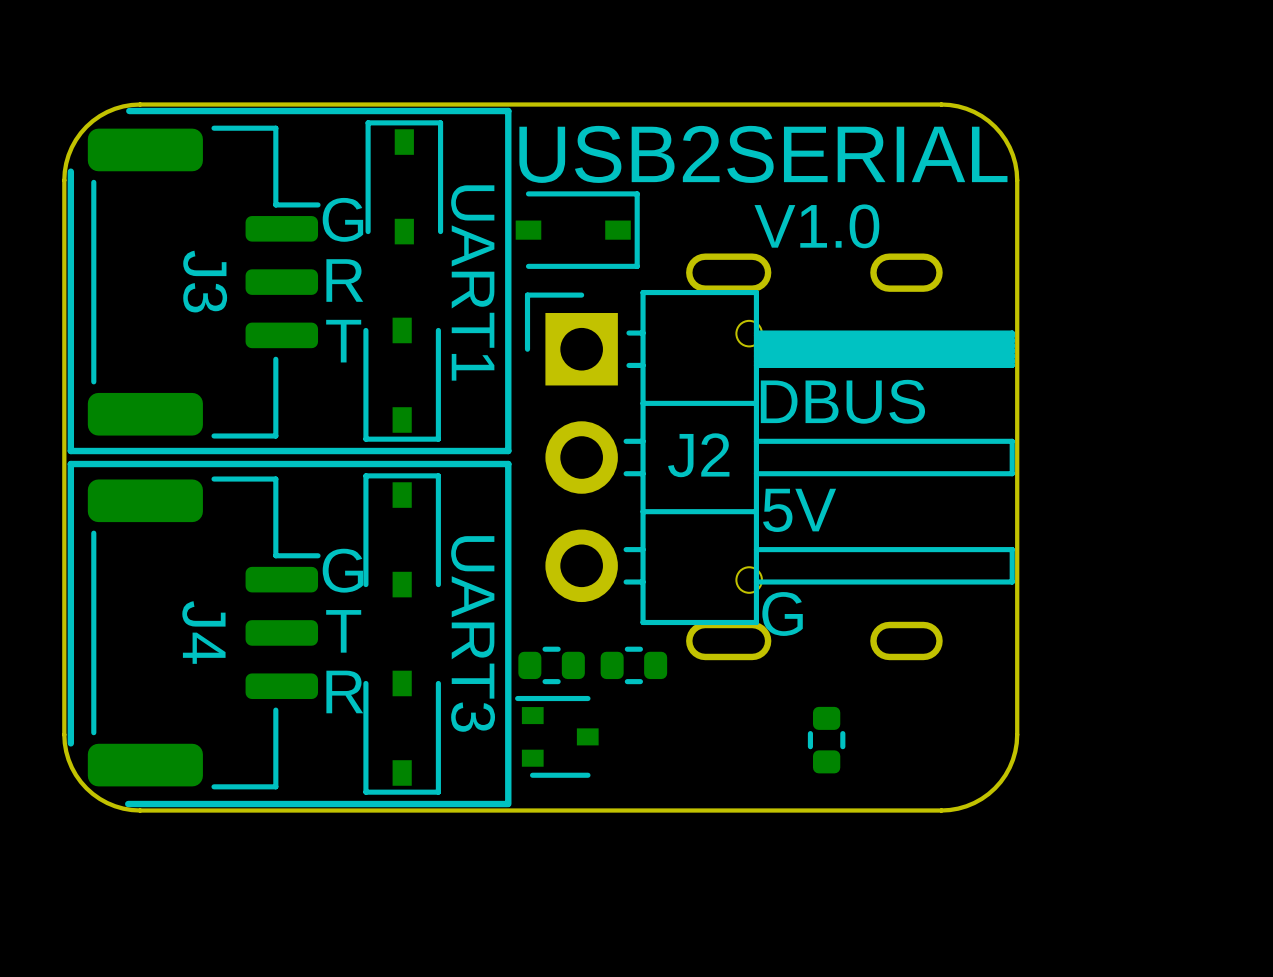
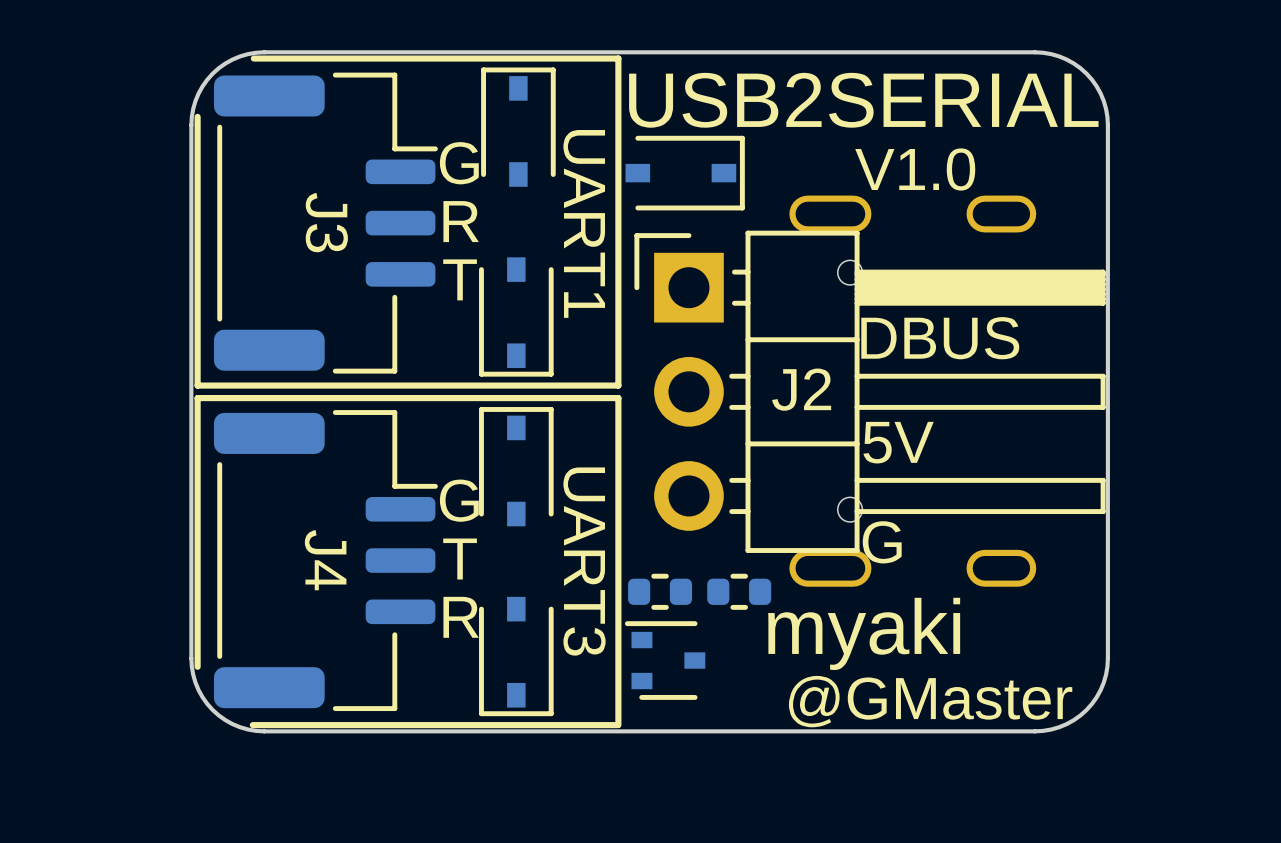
text: none -> myaki (864, 633)
part: (826, 740) -> none
text: none -> @GMaster (930, 701)

